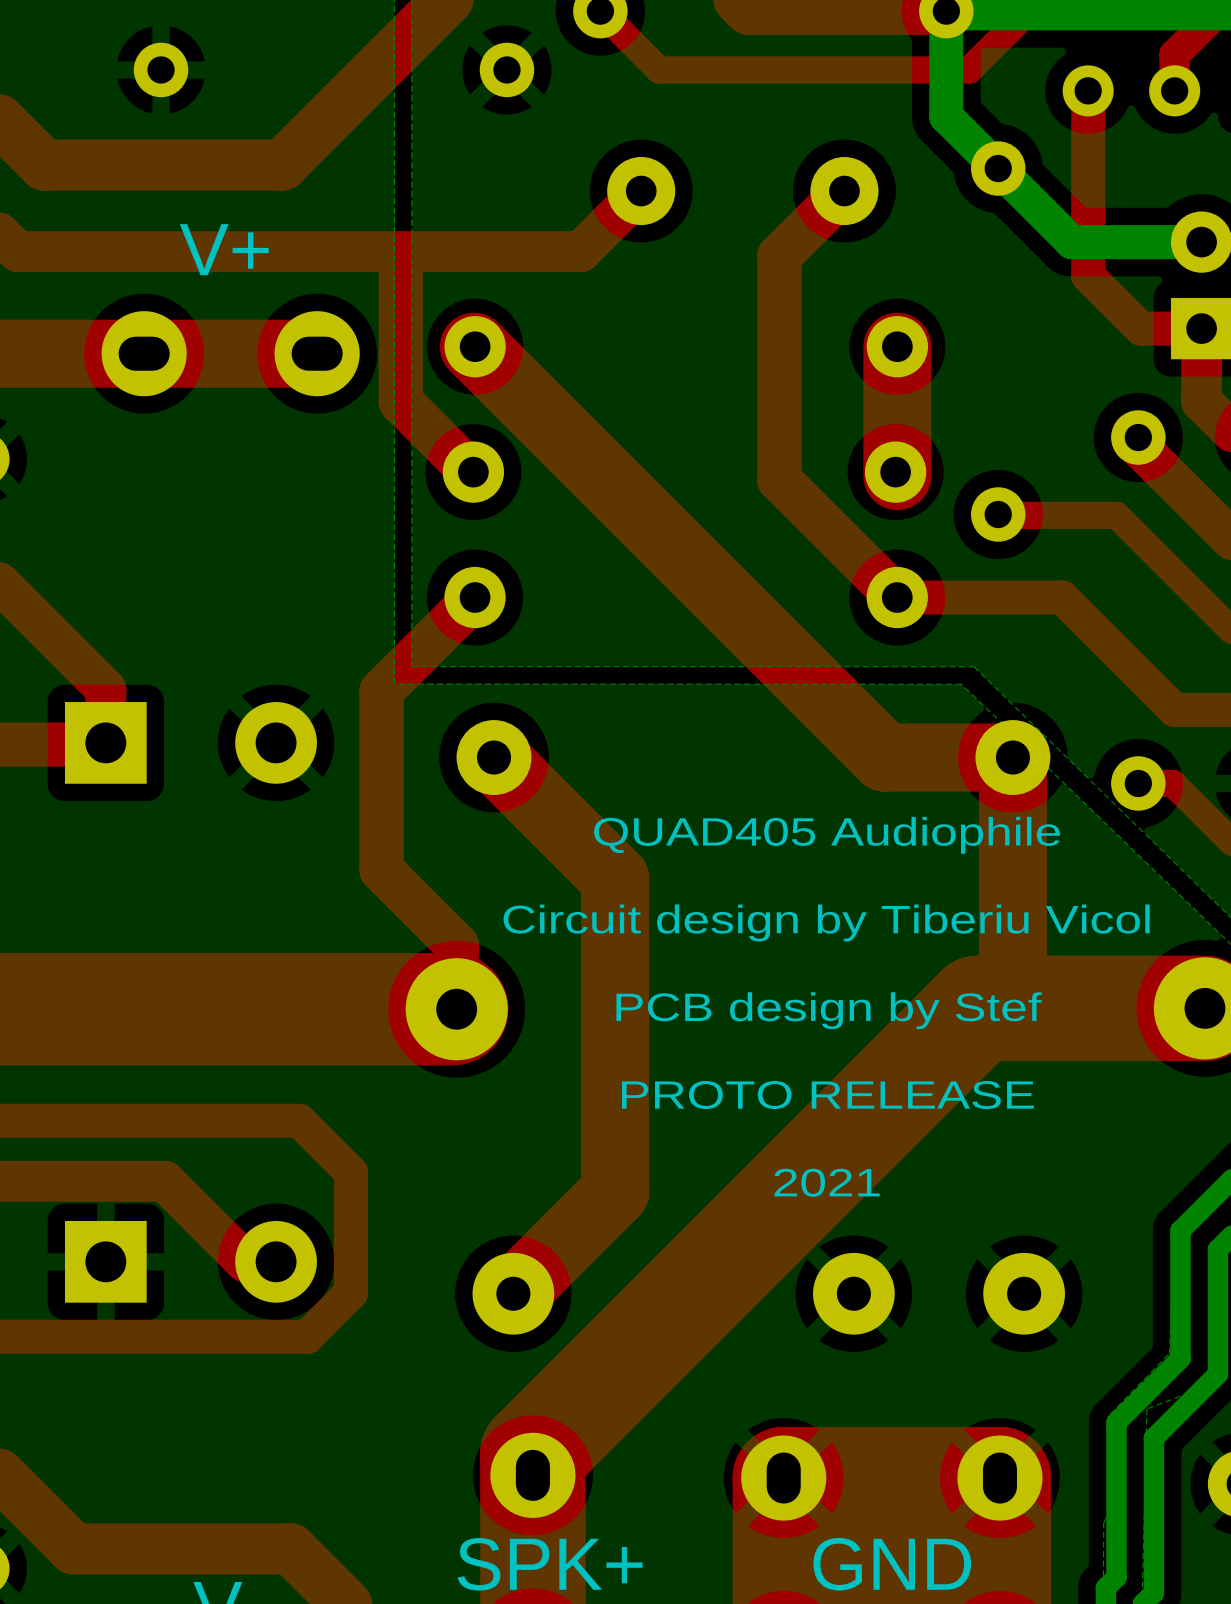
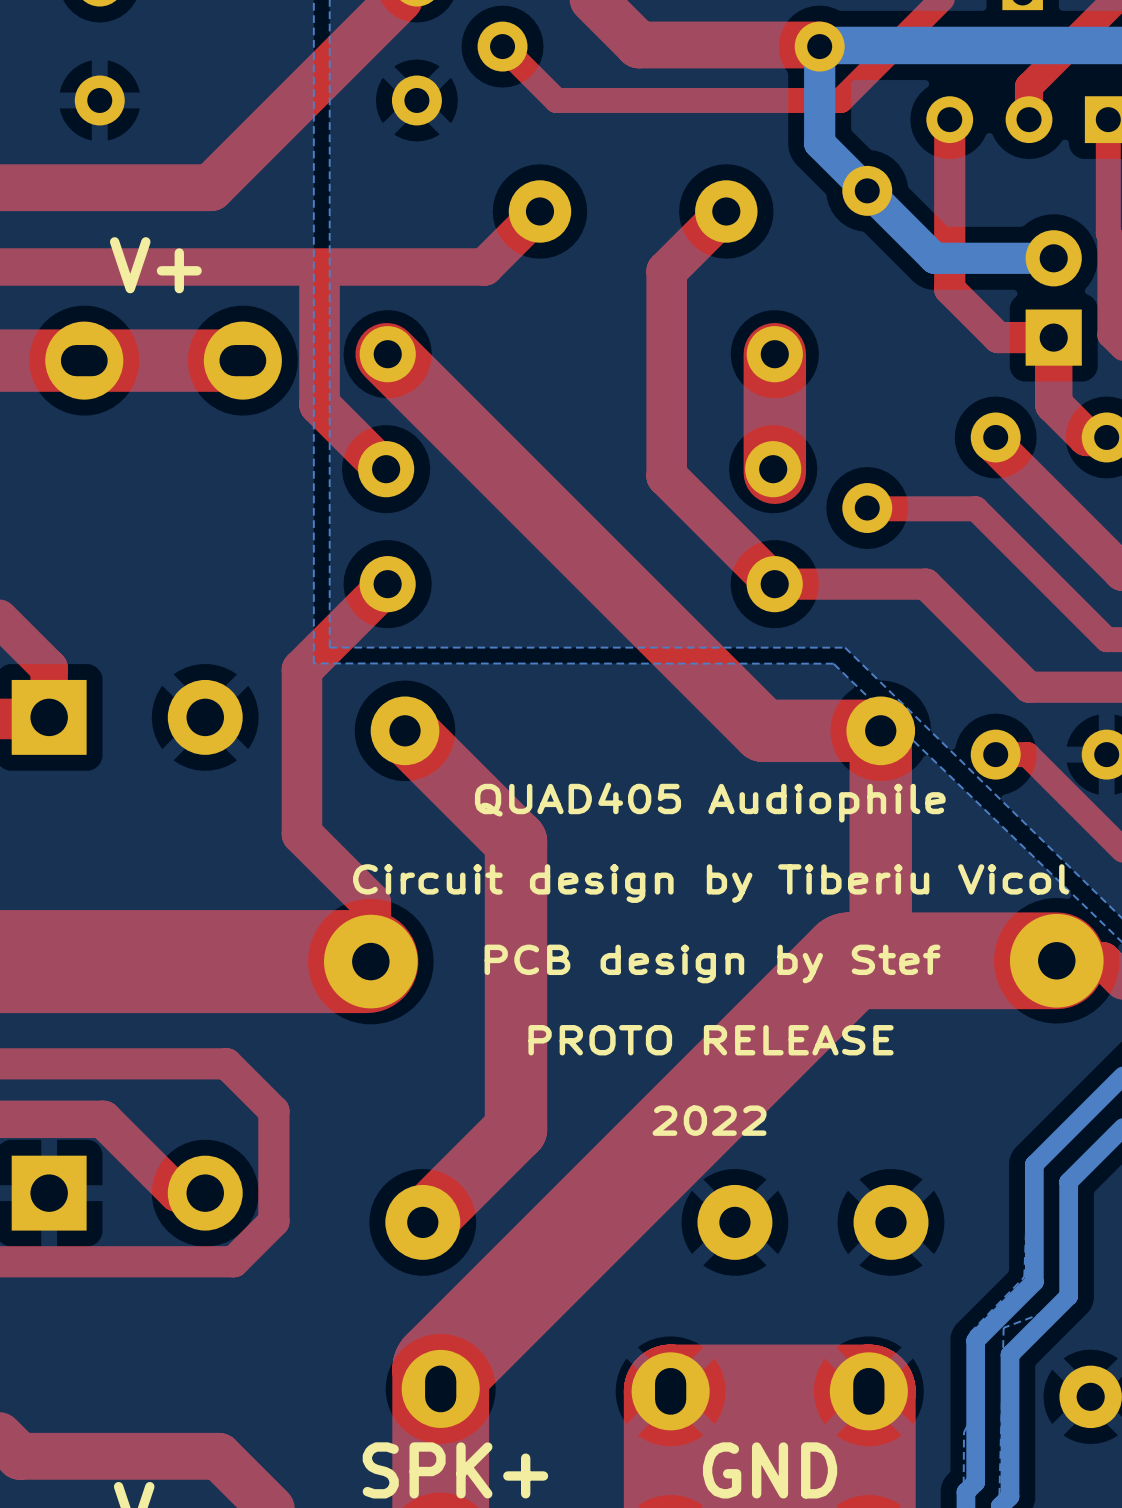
text: 2021 (827, 1182) -> 2022 (709, 1120)

